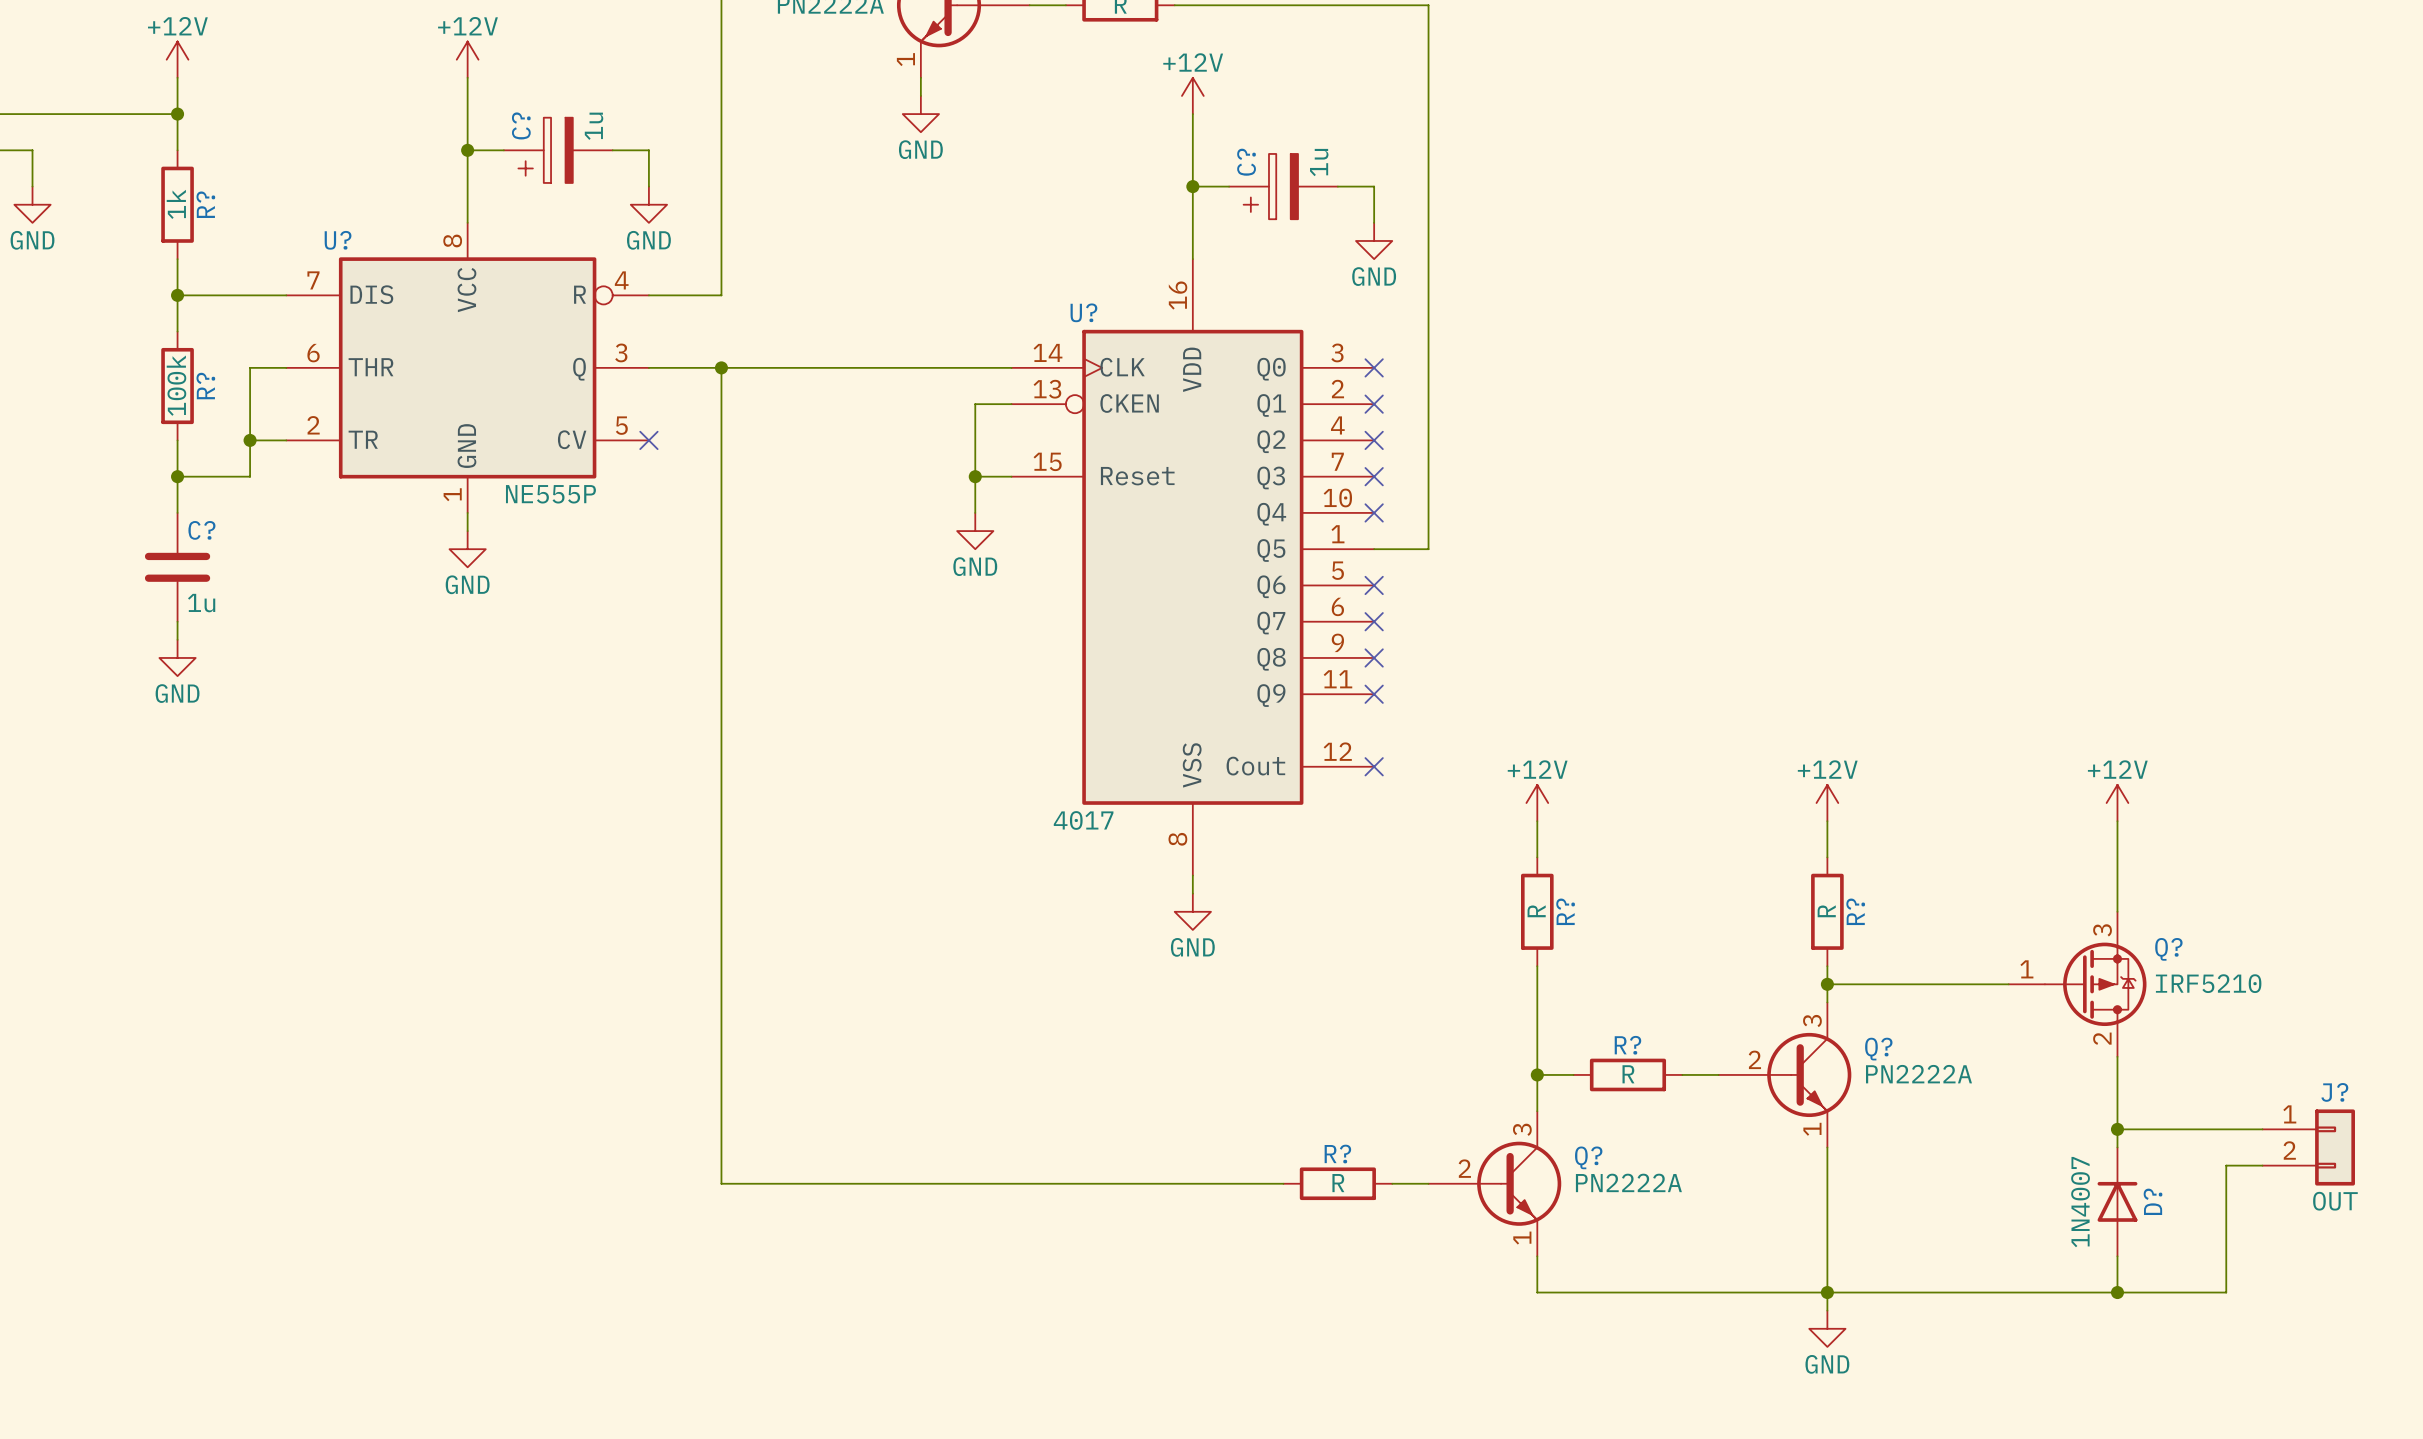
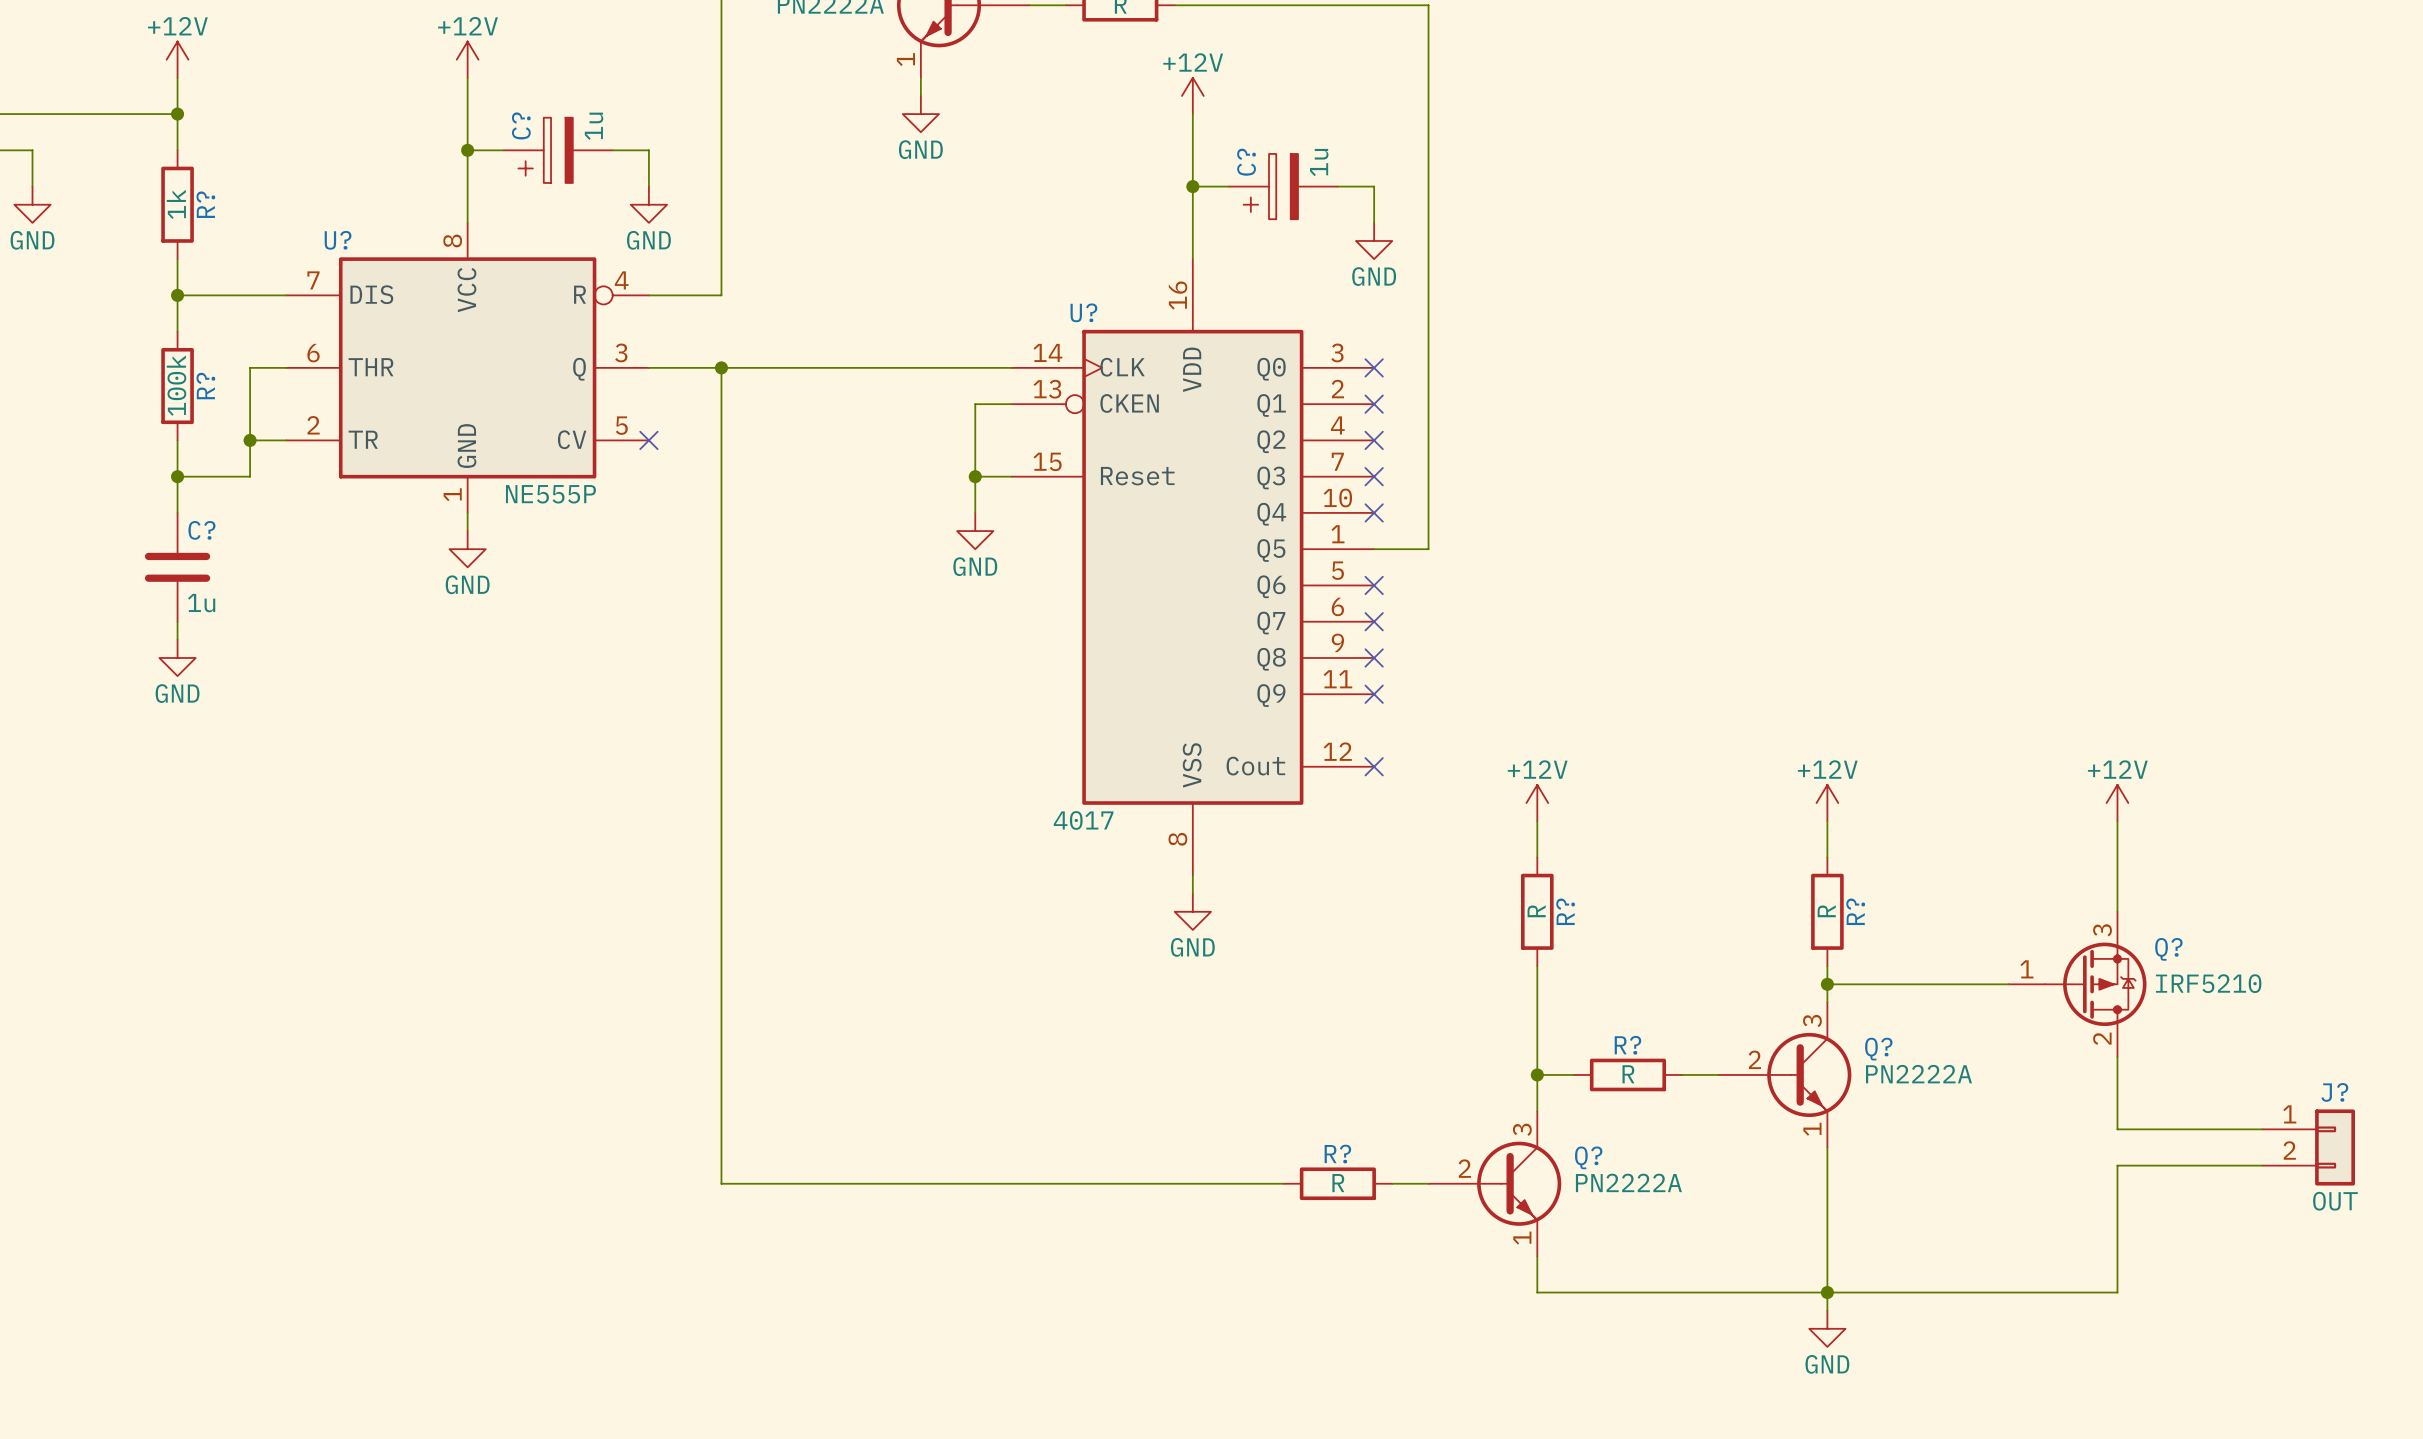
wire: (2117, 1129) (2117, 1147) -> none
junction: (2117, 1129) -> none
wire: (2226, 1165) (2226, 1292) (2117, 1292) -> (2226, 1165) (2117, 1165) (2117, 1256)
D?: 1N4007 (2117, 1201) -> none
junction: (2117, 1292) -> none

